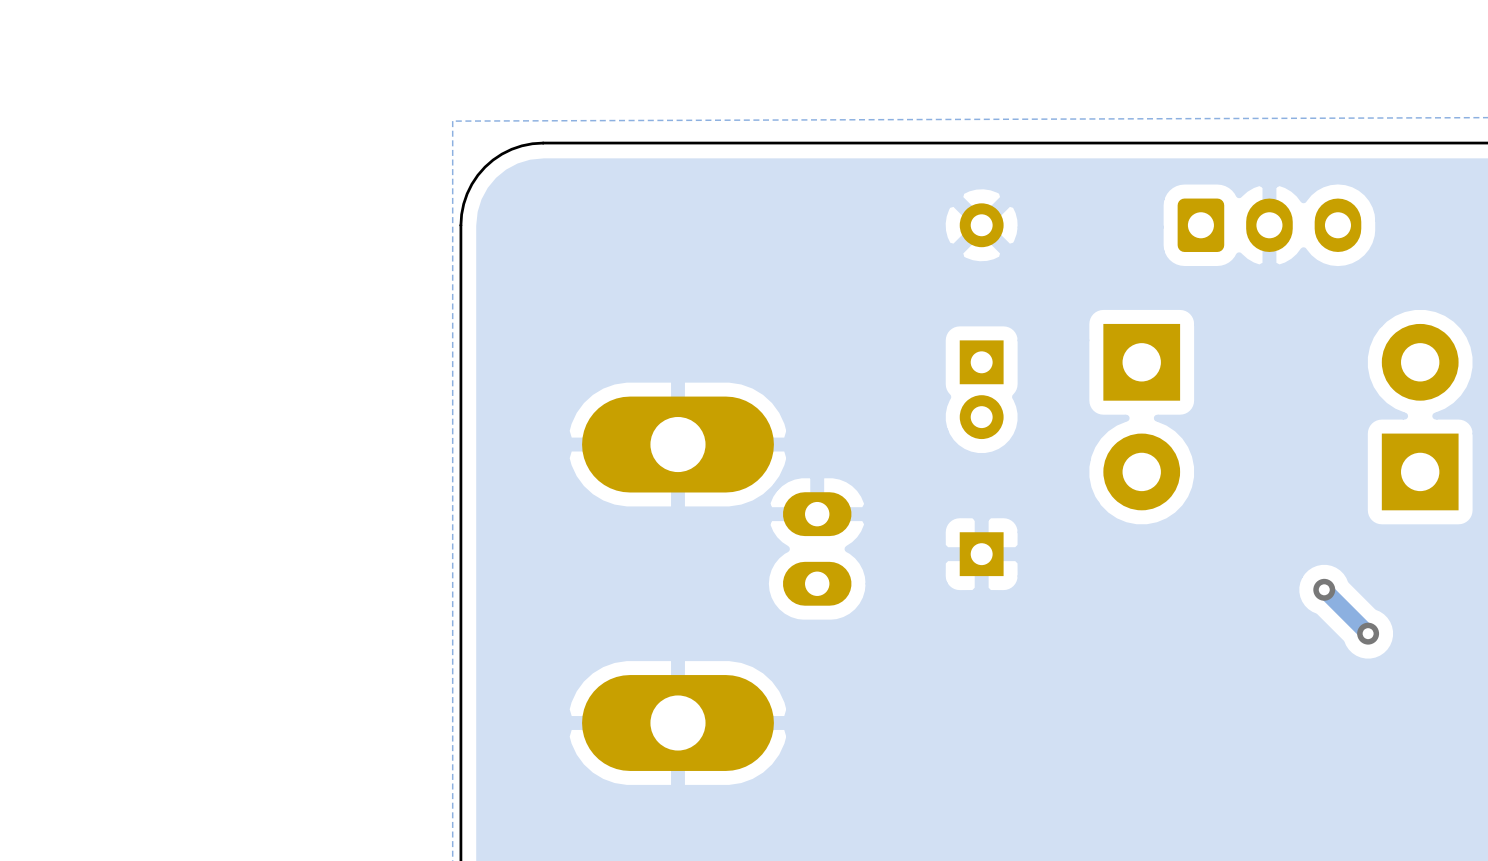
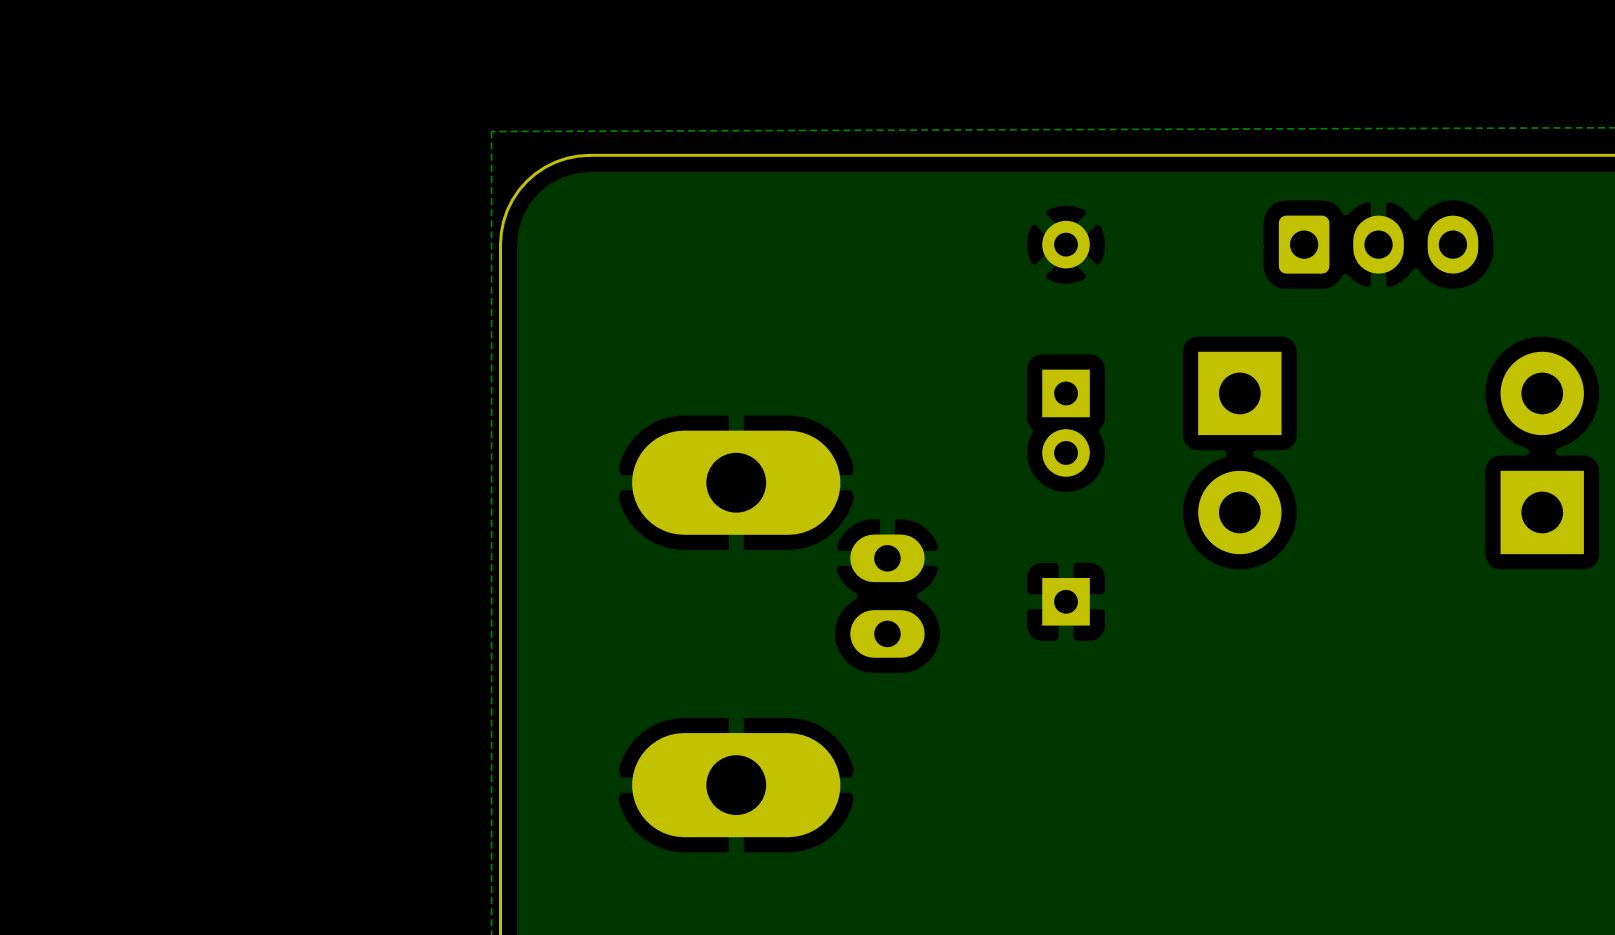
track: (1324, 589) (1368, 633) -> none
via: (1324, 589) -> none
via: (1368, 633) -> none

